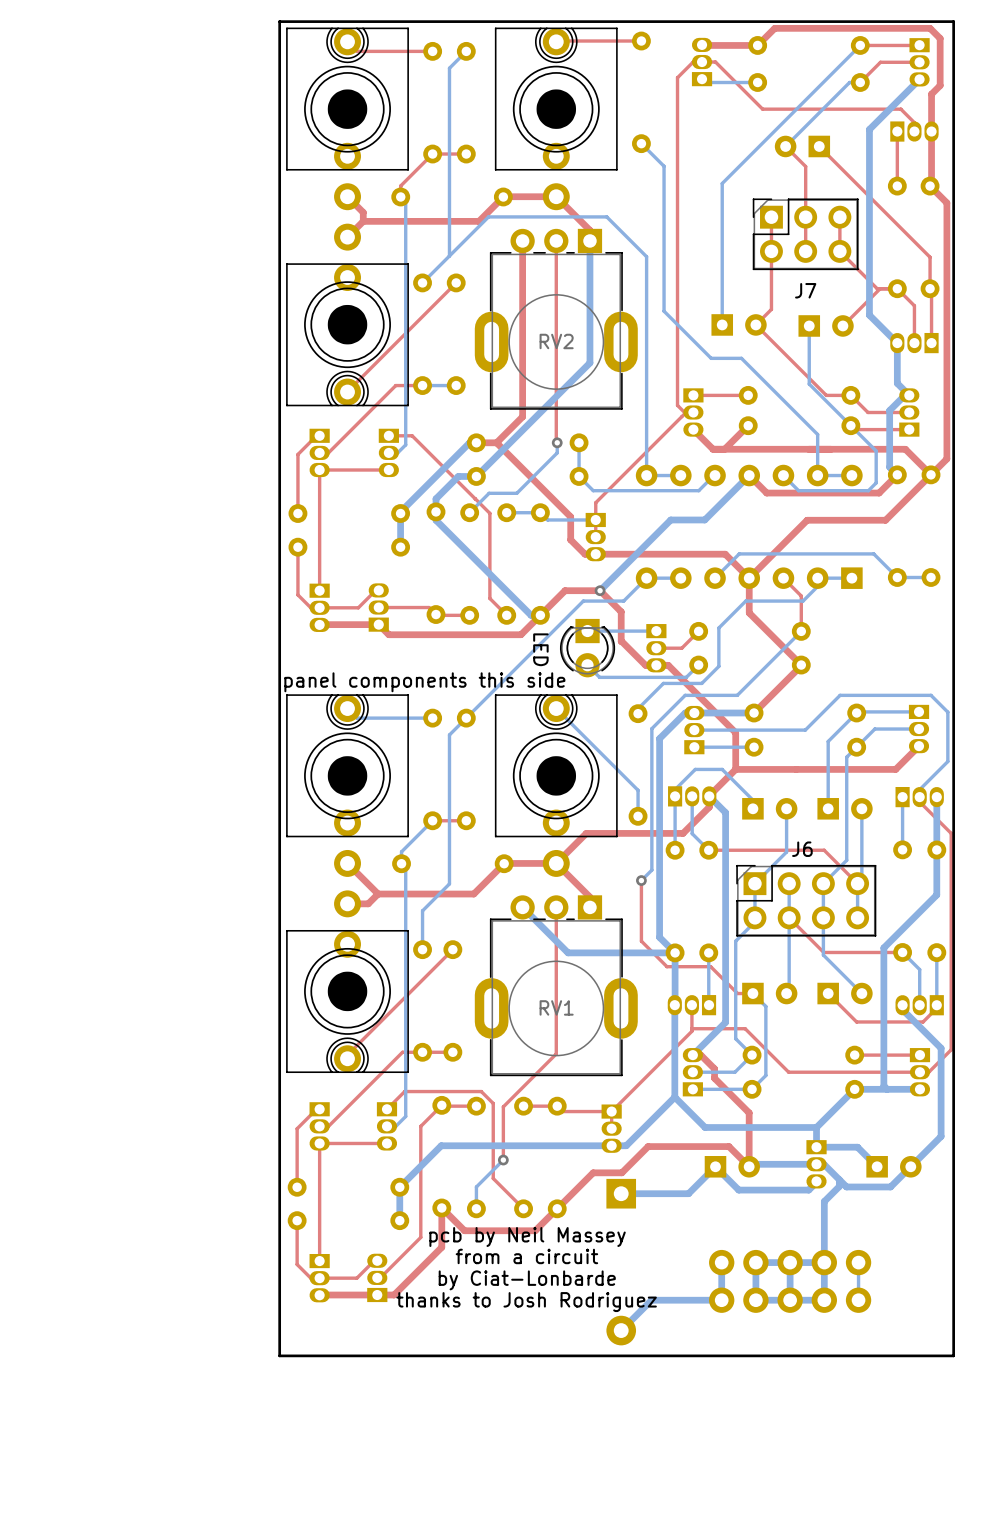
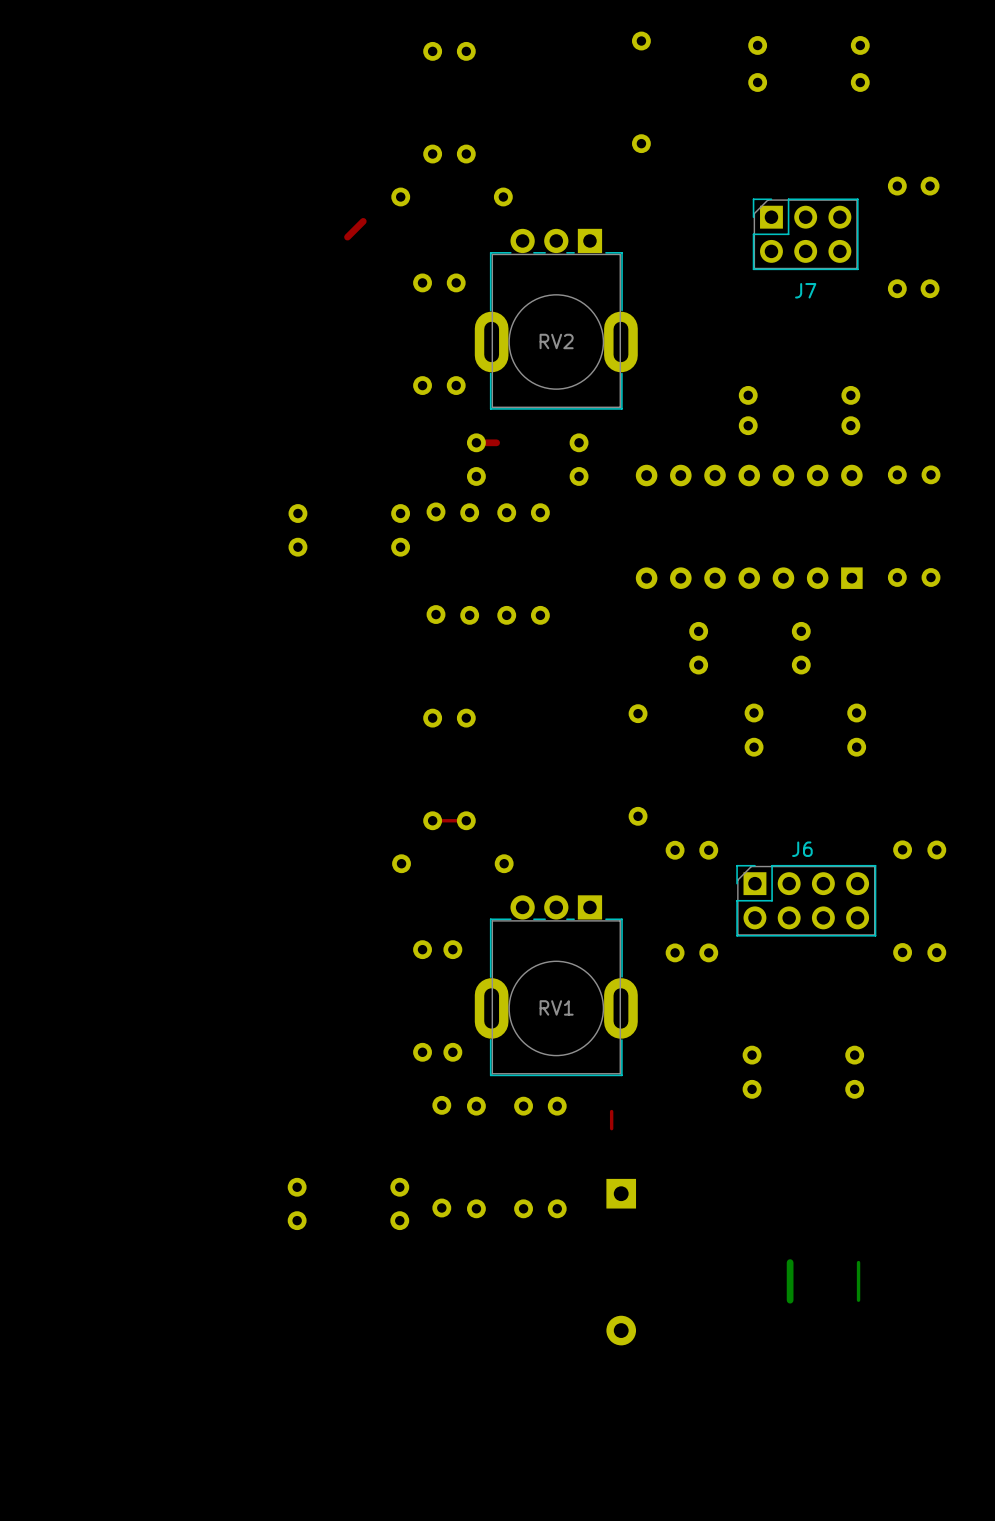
board edge: (953, 21) (953, 1355) (279, 1355) (279, 21) (953, 21) -> none
top track: (347, 41) (357, 51) (432, 51) -> none
top track: (641, 41) (556, 41) -> none
top track: (702, 44) (757, 45) (774, 28) (930, 28) (940, 38) (940, 85) (931, 94) (931, 186) -> none
bottom track: (860, 45) (722, 183) (722, 324) -> none
top track: (919, 45) (860, 45) -> none
bottom track: (466, 51) (449, 68) (449, 255) -> none
part: (702, 62) -> none
top track: (919, 62) (880, 62) (860, 82) -> none
part: (919, 62) -> none
bottom track: (702, 79) (705, 82) (757, 82) -> none
bottom track: (919, 79) (869, 129) (869, 315) (897, 343) (897, 383) (909, 395) (904, 395) (889, 410) (889, 467) (897, 474) -> none
bottom track: (860, 82) (849, 82) (785, 146) -> none
part: (347, 118) -> none
part: (556, 118) -> none
top track: (897, 131) (897, 186) -> none
top track: (914, 131) (914, 122) (900, 109) (762, 109) (715, 62) (693, 62) (677, 77) (677, 405) (684, 412) (693, 412) -> none
part: (914, 131) -> none
bottom track: (641, 143) (664, 166) (664, 311) (711, 358) (741, 358) (817, 434) (817, 475) (851, 475) -> none
top track: (785, 146) (805, 166) (805, 251) -> none
part: (802, 146) -> none
top track: (819, 146) (930, 257) (931, 343) -> none
top track: (466, 154) (432, 154) (400, 185) (400, 196) -> none
top track: (930, 186) (946, 202) (946, 458) (885, 520) (807, 520) (749, 578) -> none
top track: (347, 196) (363, 212) (363, 221) (478, 221) (503, 196) (556, 196) (589, 230) (589, 240) -> none
bottom track: (400, 196) (405, 201) (405, 444) (397, 452) (388, 452) -> none
top track: (771, 217) (771, 309) (755, 324) (826, 395) (850, 395) (867, 412) (909, 412) -> none
top track: (839, 217) (839, 251) (877, 288) (897, 288) (914, 305) (914, 343) -> none
top track: (522, 240) (522, 416) (496, 442) (570, 516) (570, 539) (584, 554) (725, 554) (749, 578) -> none
top track: (556, 240) (557, 442) -> none
bottom track: (589, 240) (589, 362) (476, 476) (458, 476) (436, 498) (436, 520) (531, 615) (540, 615) -> none
bottom track: (422, 282) (488, 216) (606, 216) (646, 256) (646, 475) (680, 475) -> none
top track: (456, 282) (347, 392) -> none
top track: (880, 288) (842, 325) -> none
part: (347, 314) -> none
part: (739, 324) -> none
bottom track: (809, 325) (809, 384) (876, 451) (876, 482) (868, 490) (798, 490) (783, 475) -> none
part: (826, 325) -> none
part: (914, 343) -> none
top track: (422, 385) (395, 385) (328, 452) (319, 452) -> none
bottom track: (456, 385) (422, 385) -> none
top track: (748, 395) (693, 395) -> none
top track: (686, 412) (595, 502) (595, 537) -> none
part: (693, 412) -> none
part: (909, 412) -> none
top track: (748, 425) (724, 449) -> none
top track: (850, 425) (854, 429) (909, 429) -> none
top track: (693, 429) (713, 449) (905, 449) (931, 474) -> none
top track: (319, 435) (316, 435) (297, 454) (297, 513) -> none
top track: (388, 435) (412, 435) (475, 498) -> none
bottom track: (476, 442) (469, 442) (400, 511) (400, 547) -> none
bottom track: (557, 442) (557, 452) (516, 493) (489, 493) (469, 512) -> none
via: (557, 442) -> none
bottom track: (579, 442) (579, 476) (593, 490) (698, 490) (715, 475) -> none
part: (319, 452) -> none
part: (388, 452) -> none
top track: (388, 470) (319, 470) (319, 590) -> none
top track: (897, 474) (879, 493) (766, 493) (749, 475) -> none
bottom track: (749, 475) (704, 519) (670, 519) (600, 590) -> none
top track: (475, 498) (489, 513) (489, 598) (506, 615) -> none
bottom track: (506, 512) (540, 512) (547, 519) (595, 519) -> none
part: (595, 537) -> none
top track: (297, 547) (297, 594) (310, 607) (358, 607) (375, 590) (378, 590) -> none
bottom track: (931, 577) (897, 577) (873, 553) (739, 553) (715, 578) -> none
bottom track: (680, 578) (646, 578) (623, 601) (583, 601) (449, 734) (449, 883) (422, 910) (422, 949) -> none
top track: (749, 578) (749, 612) (801, 665) -> none
top track: (783, 578) (801, 596) (801, 631) -> none
bottom track: (851, 578) (817, 578) (817, 586) (803, 601) (745, 601) (718, 628) (718, 666) (701, 683) (663, 683) (638, 708) (638, 713) -> none
via: (600, 590) -> none
part: (319, 607) -> none
top track: (378, 607) (429, 607) (436, 615) (469, 615) -> none
part: (378, 607) -> none
top track: (319, 624) (378, 624) (388, 634) (521, 634) (565, 590) (600, 590) (621, 611) (621, 641) (645, 665) (668, 665) (735, 732) (735, 769) -> none
bottom track: (656, 631) (587, 631) -> none
top track: (698, 631) (681, 648) (656, 648) -> none
bottom track: (801, 631) (737, 695) (685, 695) (651, 728) (651, 870) (641, 880) -> none
part: LED (587, 648) -> none
part: (656, 648) -> none
bottom track: (698, 665) (686, 677) (599, 677) (587, 665) -> none
top track: (801, 665) (754, 712) -> none
text: panel components this side (424, 682) -> none
bottom track: (347, 708) (357, 718) (432, 718) -> none
bottom track: (556, 708) (638, 790) (638, 816) -> none
bottom track: (919, 711) (857, 711) (828, 741) (828, 808) -> none
bottom track: (754, 712) (685, 712) (659, 738) (659, 937) (675, 952) -> none
bottom track: (919, 729) (874, 729) (846, 757) (846, 860) (823, 883) (823, 955) (861, 993) -> none
part: (919, 729) -> none
bottom track: (694, 730) (805, 730) (840, 695) (931, 695) (947, 712) (947, 761) (919, 789) (919, 797) -> none
part: (694, 730) -> none
top track: (919, 746) (895, 769) (735, 769) -> none
bottom track: (754, 747) (694, 747) -> none
top track: (735, 769) (709, 795) (709, 807) (683, 833) (586, 833) (556, 863) -> none
part: (347, 785) -> none
part: (556, 785) -> none
bottom track: (692, 796) (692, 833) (708, 850) -> none
part: (692, 796) -> none
bottom track: (709, 796) (725, 812) (725, 1022) (692, 1055) -> none
bottom track: (902, 797) (902, 849) -> none
top track: (919, 797) (919, 801) (951, 833) (951, 1049) (928, 1072) (788, 1072) (745, 1028) (691, 1028) -> none
part: (919, 797) -> none
bottom track: (936, 797) (936, 894) (883, 947) (883, 1085) (887, 1089) -> none
bottom track: (752, 808) (752, 800) (722, 769) (695, 769) (675, 789) (675, 850) -> none
part: (769, 808) -> none
bottom track: (786, 808) (786, 852) (754, 883) (754, 921) (735, 941) (735, 1038) (752, 1055) (734, 1072) (692, 1072) -> none
part: (845, 808) -> none
bottom track: (861, 808) (861, 879) (857, 883) (857, 917) -> none
bottom track: (432, 820) (401, 851) (401, 863) (405, 867) (405, 1116) (395, 1126) (386, 1126) -> none
top track: (708, 850) (824, 850) (857, 883) -> none
top track: (347, 863) (378, 894) -> none
top track: (556, 863) (504, 863) (473, 894) (378, 894) -> none
top track: (556, 863) (589, 897) (589, 907) -> none
top track: (641, 880) (641, 941) (666, 966) (710, 966) (737, 993) (752, 993) -> none
via: (641, 880) -> none
bottom track: (789, 883) (789, 990) (786, 993) -> none
top track: (378, 894) (368, 903) (347, 903) -> none
bottom track: (522, 907) (568, 952) (675, 952) -> none
top track: (556, 907) (556, 1053) (503, 1106) (503, 1160) -> none
top track: (789, 917) (823, 952) (902, 952) -> none
top track: (452, 949) (347, 1054) (347, 1058) -> none
bottom track: (675, 952) (674, 1097) -> none
bottom track: (708, 952) (709, 1005) -> none
bottom track: (902, 952) (919, 969) (919, 1005) -> none
bottom track: (936, 952) (936, 1005) -> none
part: (347, 981) -> none
bottom track: (752, 993) (765, 1006) (765, 1075) (752, 1089) (692, 1089) -> none
part: (769, 993) -> none
top track: (828, 993) (856, 1021) (923, 1021) (936, 1008) (936, 1005) -> none
part: (845, 993) -> none
top track: (691, 1005) (691, 1031) (611, 1111) (562, 1111) (557, 1106) (523, 1106) -> none
part: (691, 1005) -> none
bottom track: (902, 1005) (902, 1009) (941, 1048) (941, 1136) (890, 1186) (846, 1186) (823, 1164) (751, 1164) (749, 1166) -> none
part: (919, 1005) -> none
top track: (452, 1052) (402, 1052) (328, 1126) (319, 1126) -> none
top track: (692, 1055) (700, 1055) (714, 1068) (714, 1078) (749, 1112) (749, 1166) (728, 1146) (648, 1146) (621, 1172) (593, 1172) (535, 1230) (464, 1230) (441, 1207) (441, 1247) (394, 1295) (319, 1295) -> none
top track: (919, 1055) (854, 1055) -> none
part: (692, 1072) -> none
part: (919, 1072) -> none
bottom track: (919, 1089) (854, 1089) (816, 1127) -> none
bottom track: (674, 1097) (705, 1127) (816, 1127) -> none
bottom track: (674, 1097) (626, 1145) (441, 1145) (399, 1187) (399, 1220) -> none
top track: (476, 1106) (441, 1105) (420, 1126) (420, 1237) (380, 1277) (377, 1277) -> none
top track: (319, 1109) (316, 1109) (297, 1128) (297, 1187) -> none
top track: (386, 1109) (404, 1091) (481, 1091) (493, 1103) (493, 1178) (523, 1208) -> none
part: (319, 1126) -> none
part: (386, 1126) -> none
bottom track: (816, 1127) (816, 1147) (857, 1147) (877, 1166) -> none
part: (611, 1128) -> none
top track: (386, 1143) (319, 1143) (319, 1261) -> none
bottom track: (503, 1160) (476, 1186) (476, 1208) -> none
via: (503, 1160) -> none
part: (816, 1164) -> none
part: (732, 1166) -> none
part: (893, 1166) -> none
bottom track: (839, 1179) (839, 1186) (824, 1201) (824, 1300) (755, 1300) (755, 1262) (824, 1262) -> none
bottom track: (816, 1181) (808, 1190) (738, 1190) (715, 1166) (688, 1193) (621, 1193) -> none
top track: (297, 1220) (297, 1264) (310, 1278) (356, 1278) (374, 1260) (377, 1260) -> none
text: pcb by Neil Massey (527, 1237) -> none
text: from a circuit (526, 1256) -> none
bottom track: (721, 1262) (721, 1300) (651, 1300) (621, 1330) -> none
part: (377, 1277) -> none
part: (319, 1278) -> none
text: by Ciat-Lonbarde (527, 1280) -> none
part: (790, 1281) -> none
text: thanks to Josh Rodriguez (526, 1302) -> none

